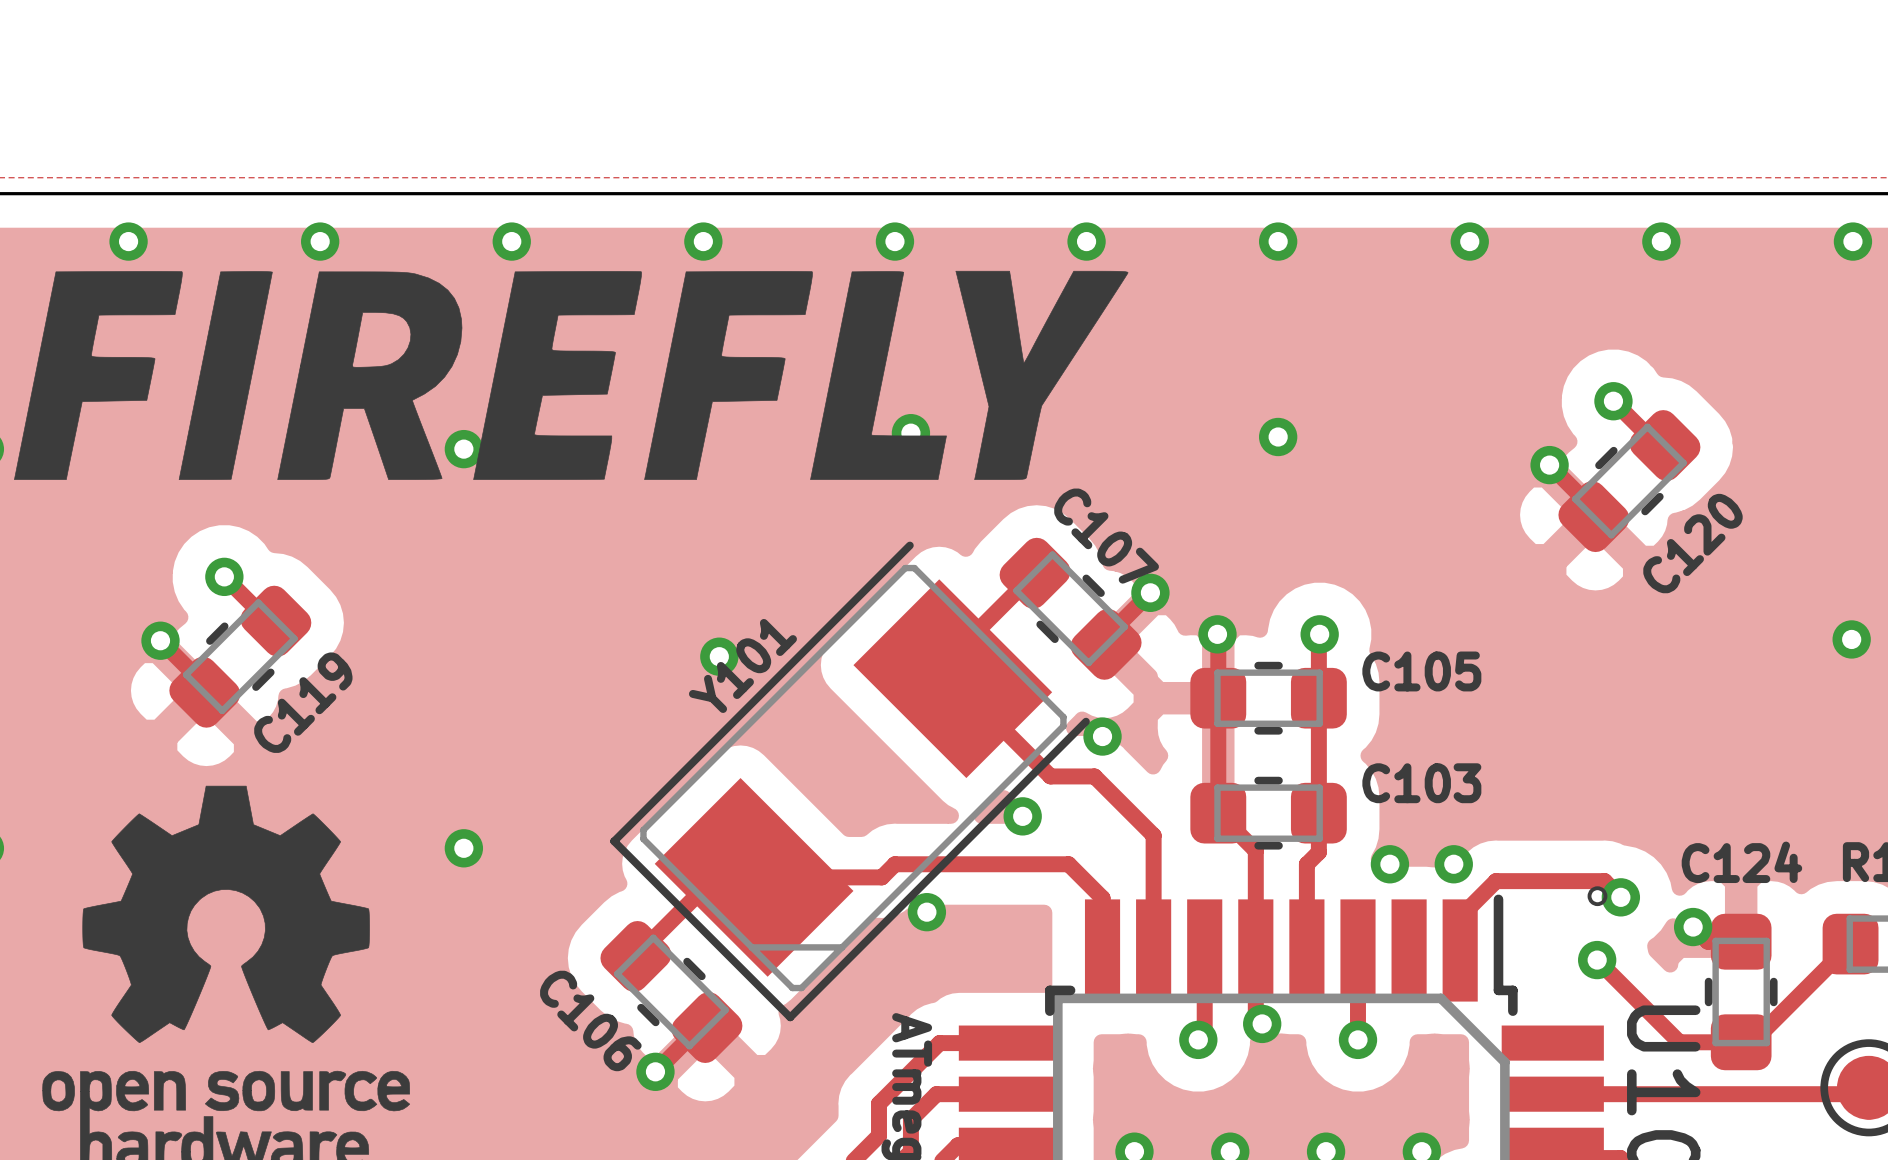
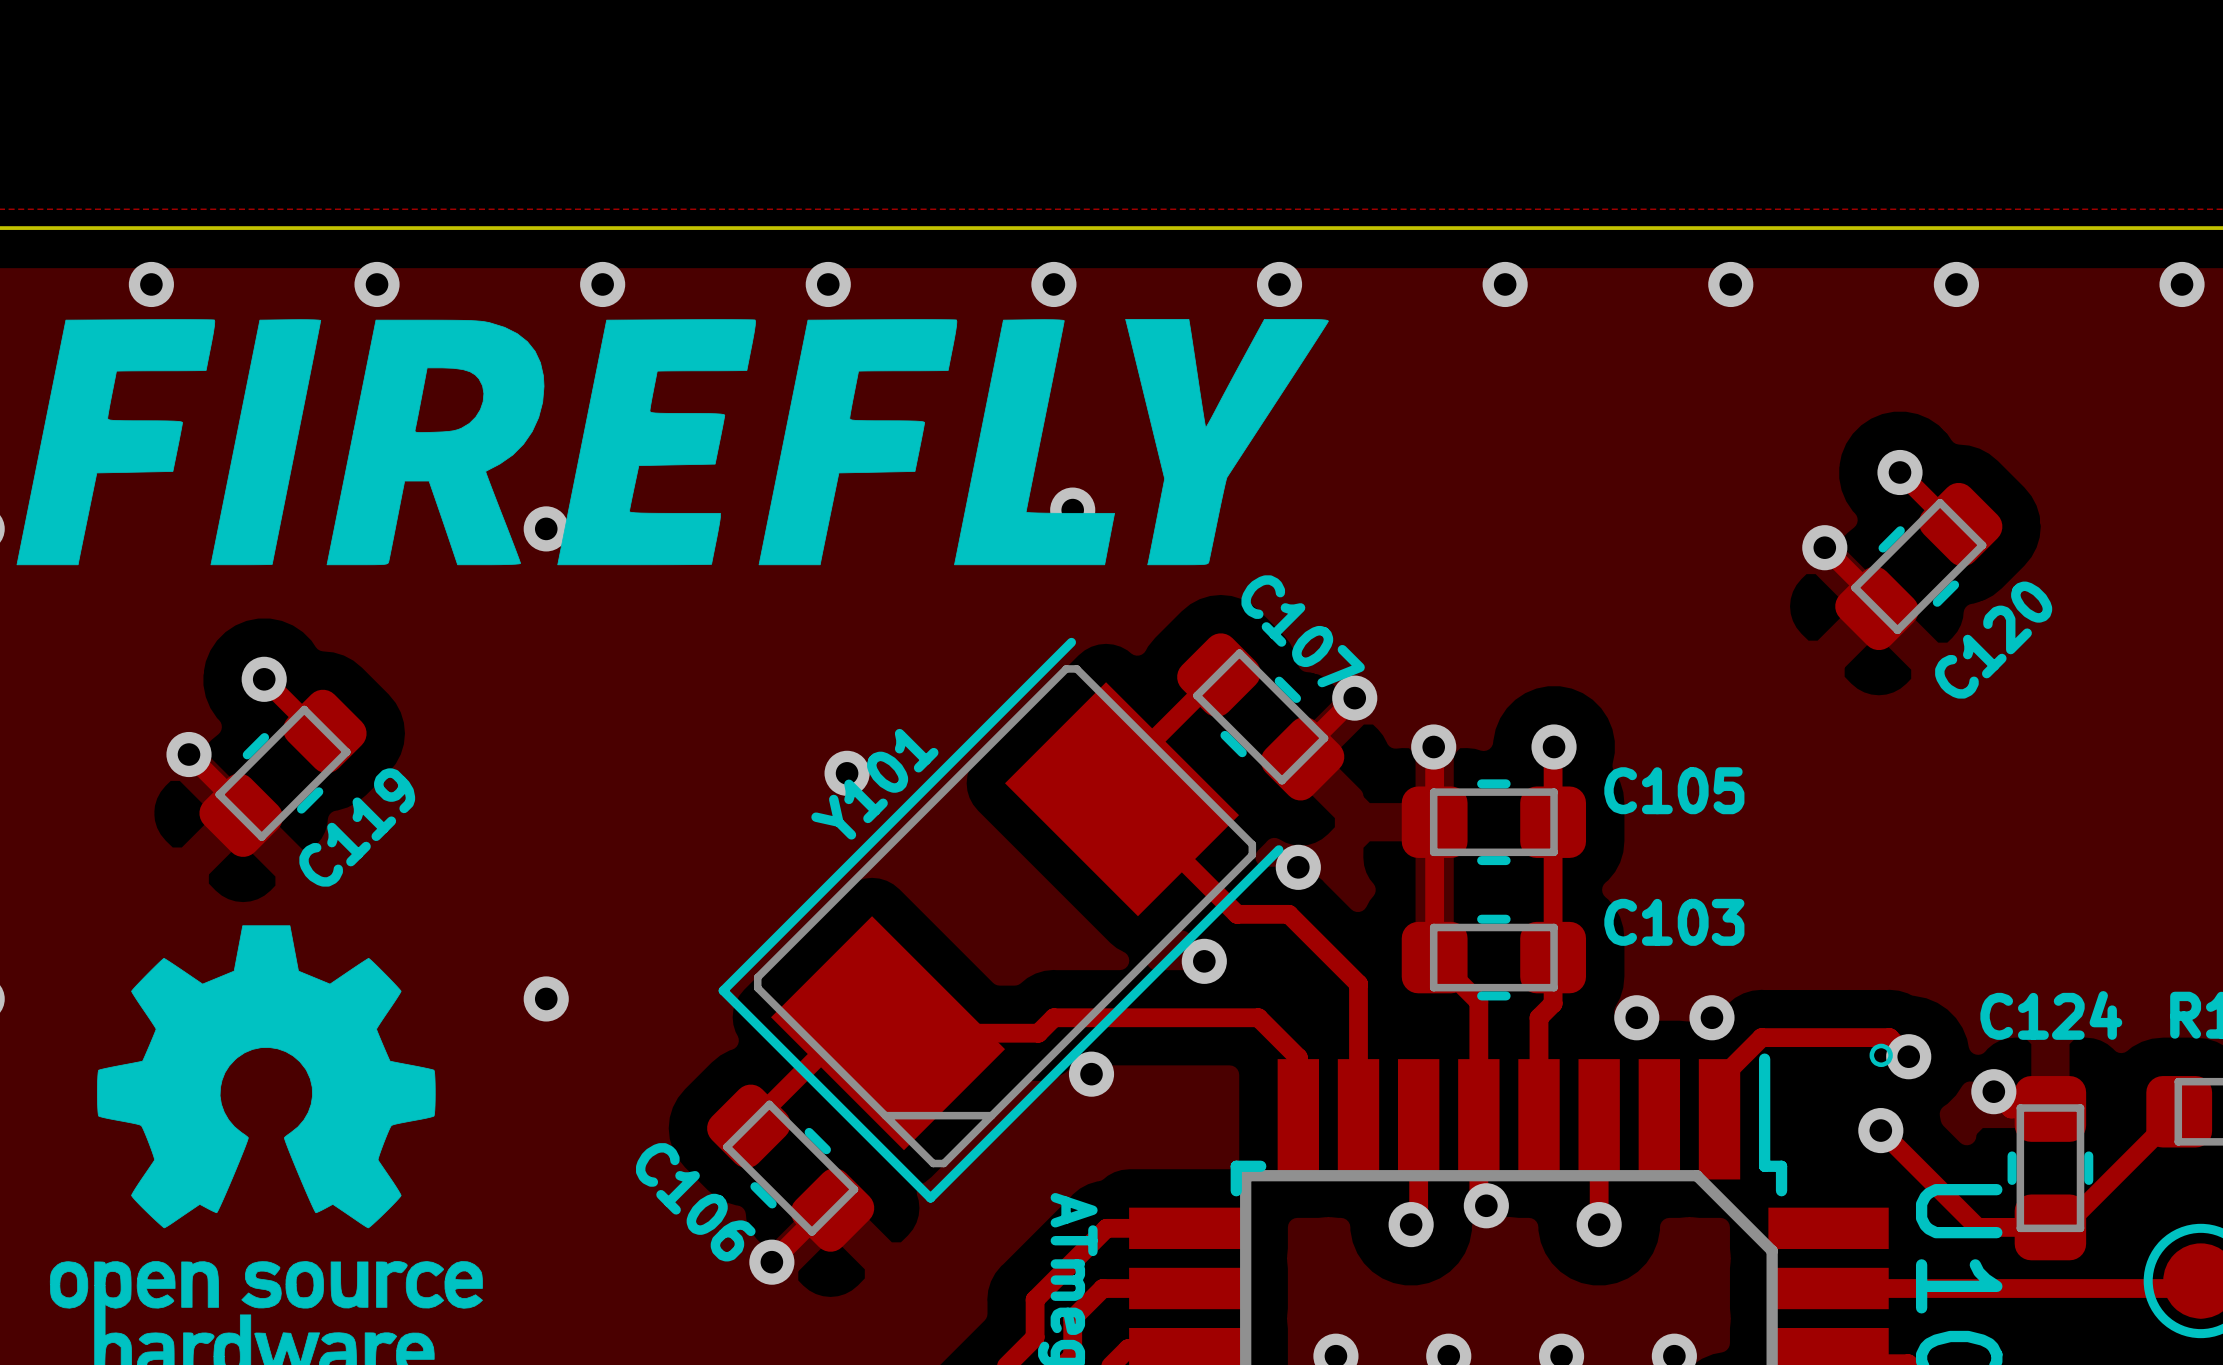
via: (1278, 437) -> none
via: (1851, 639) -> none

